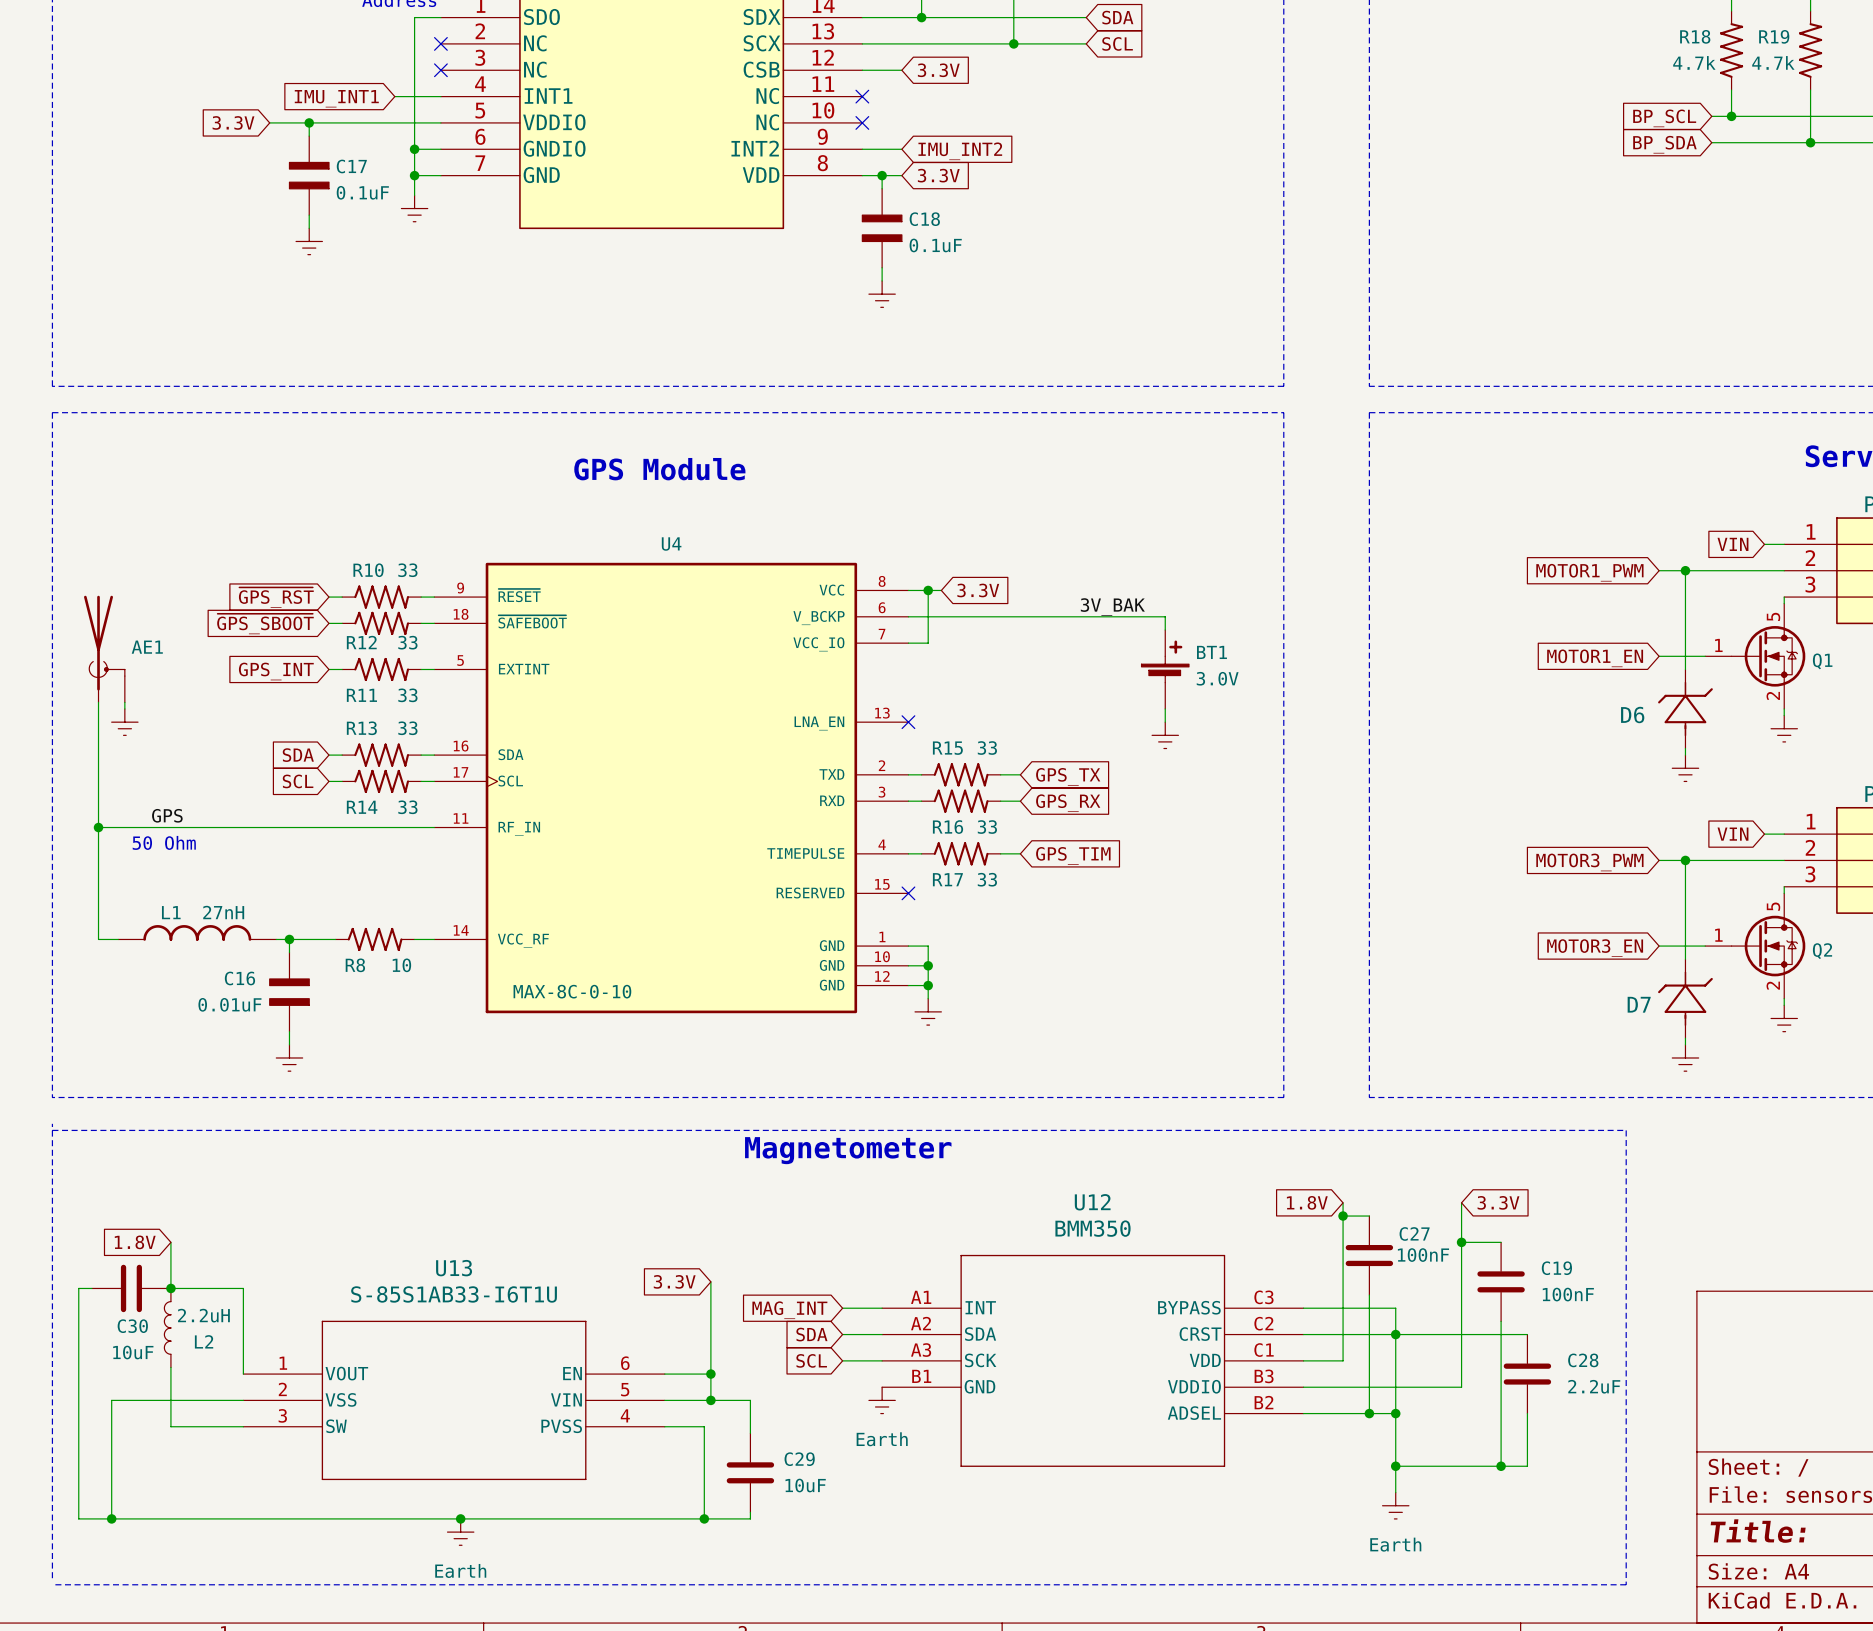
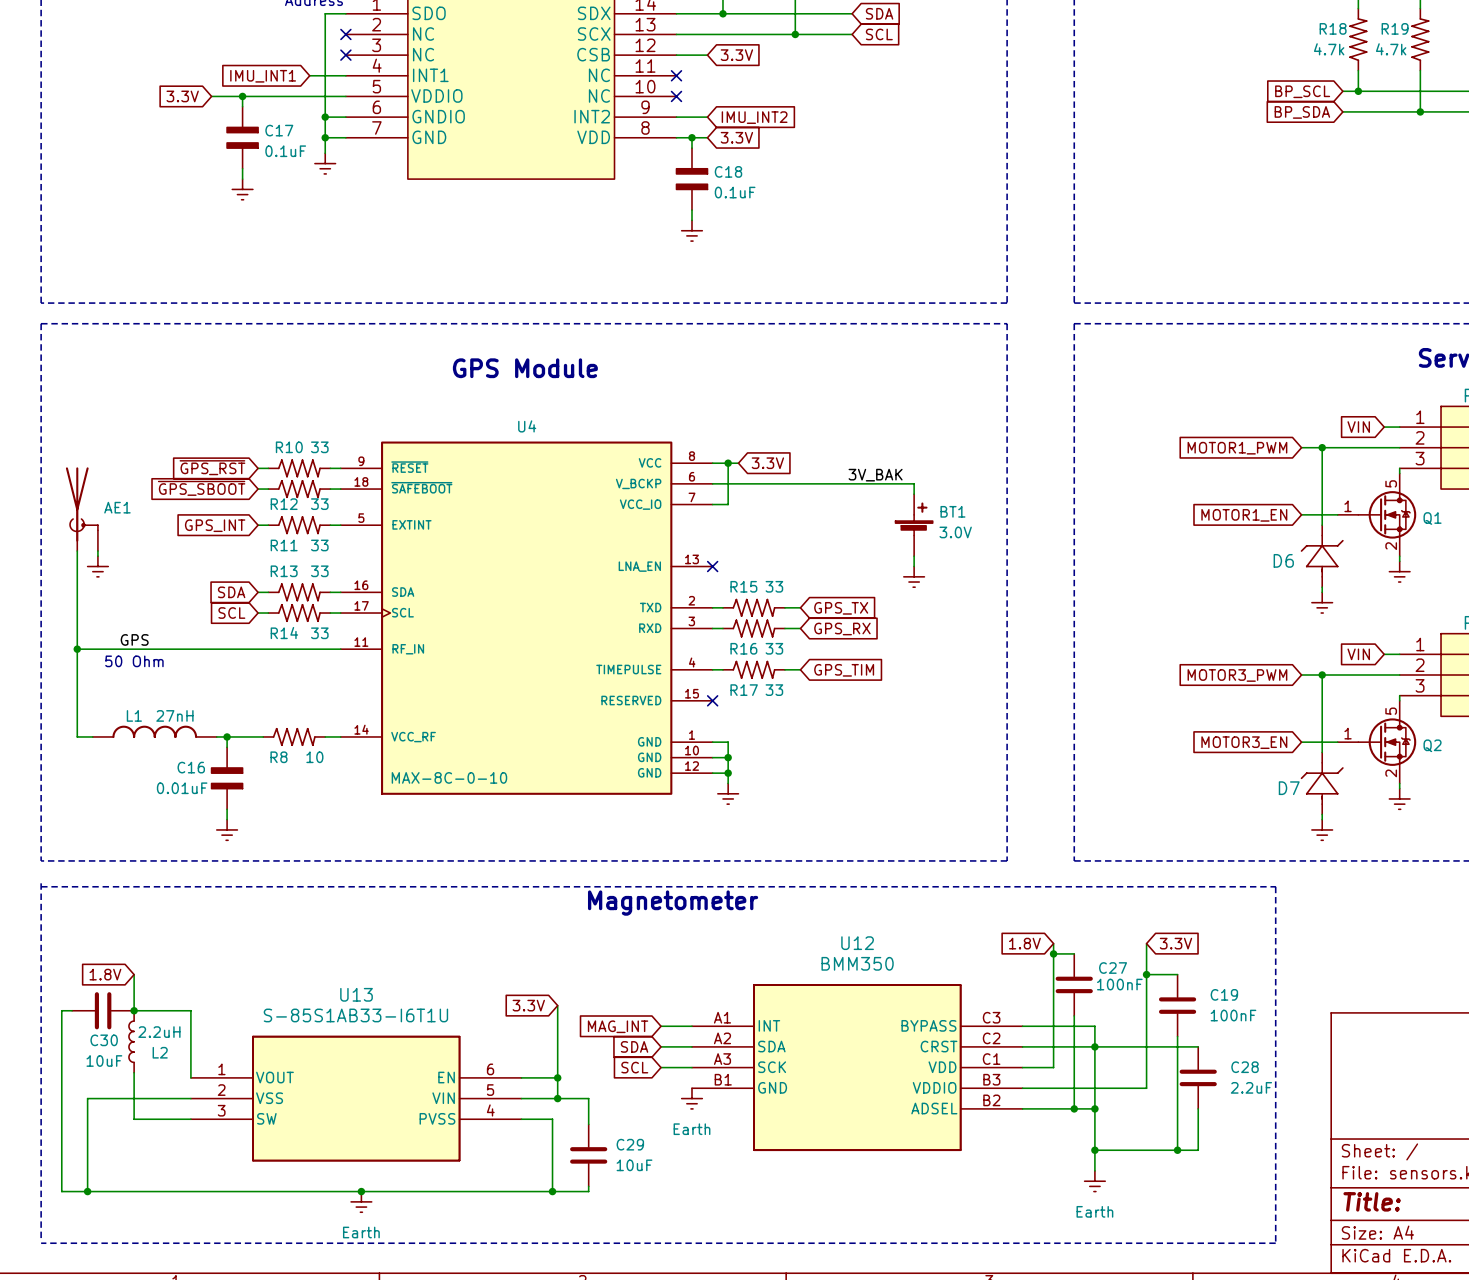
U12 symbol: [882, 1254, 1304, 1467] -> [691, 984, 1023, 1151]
U13 symbol: [243, 1320, 665, 1481] -> [190, 1036, 522, 1162]

